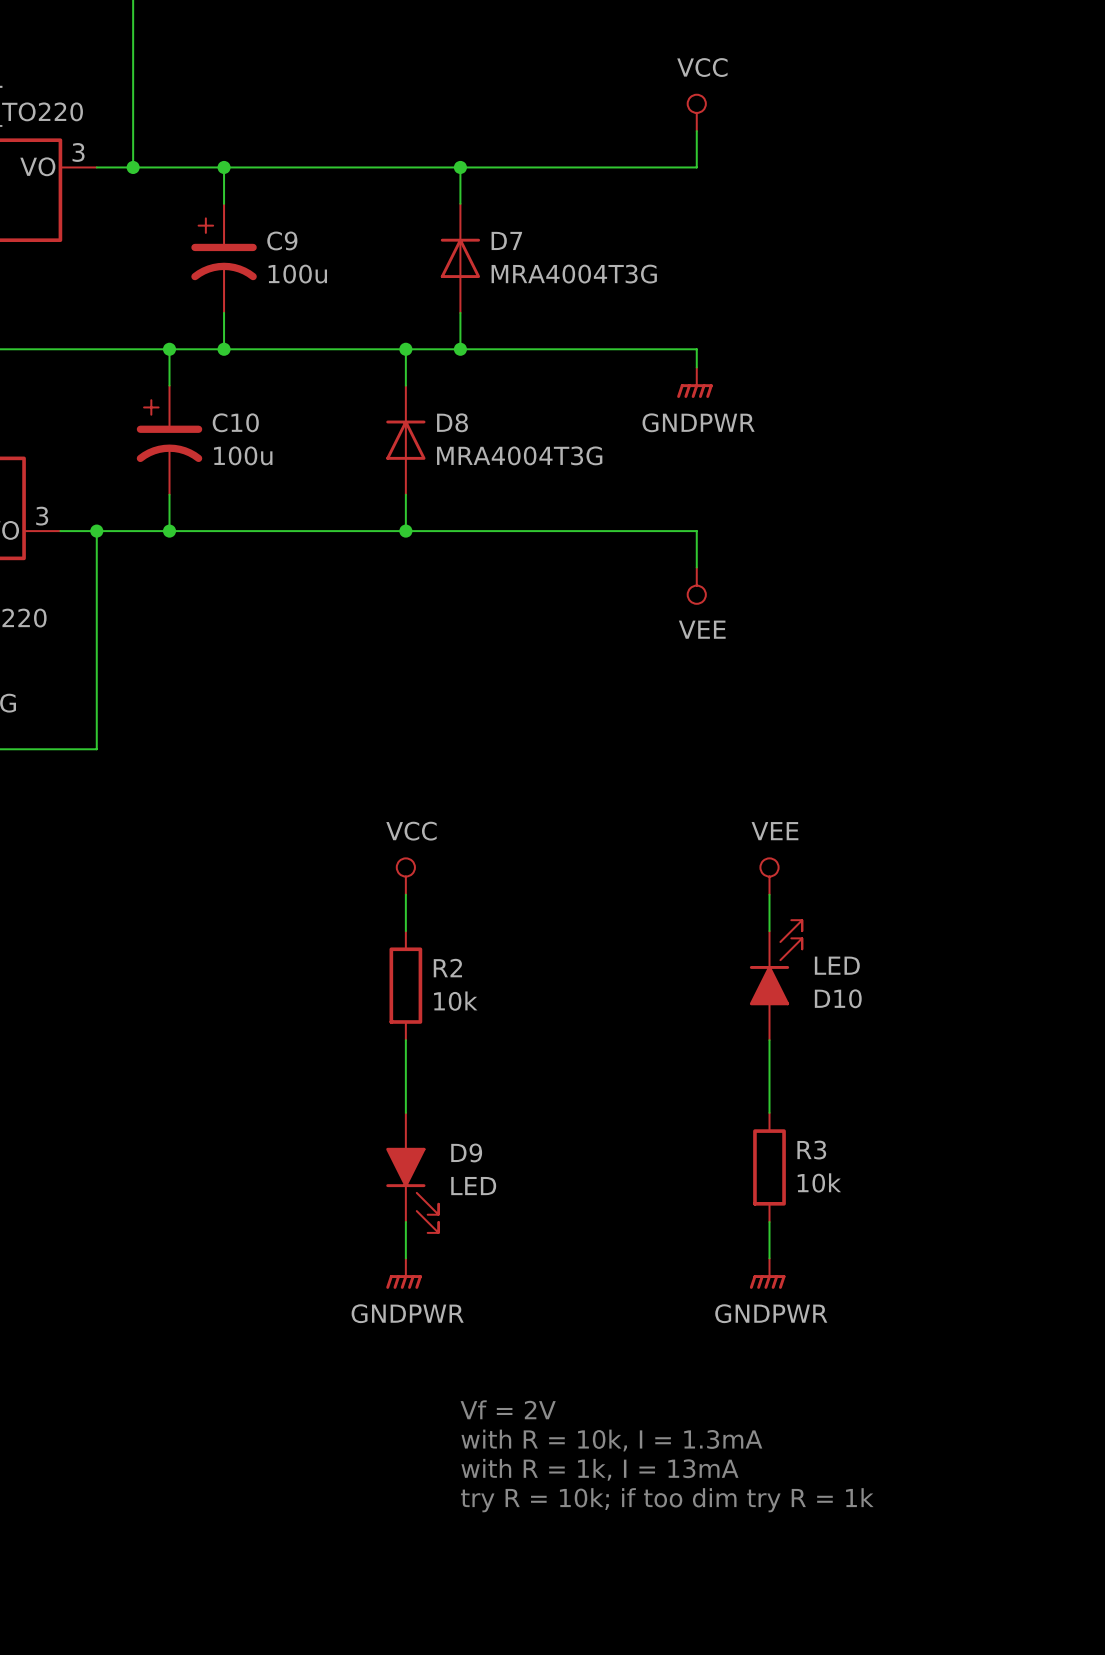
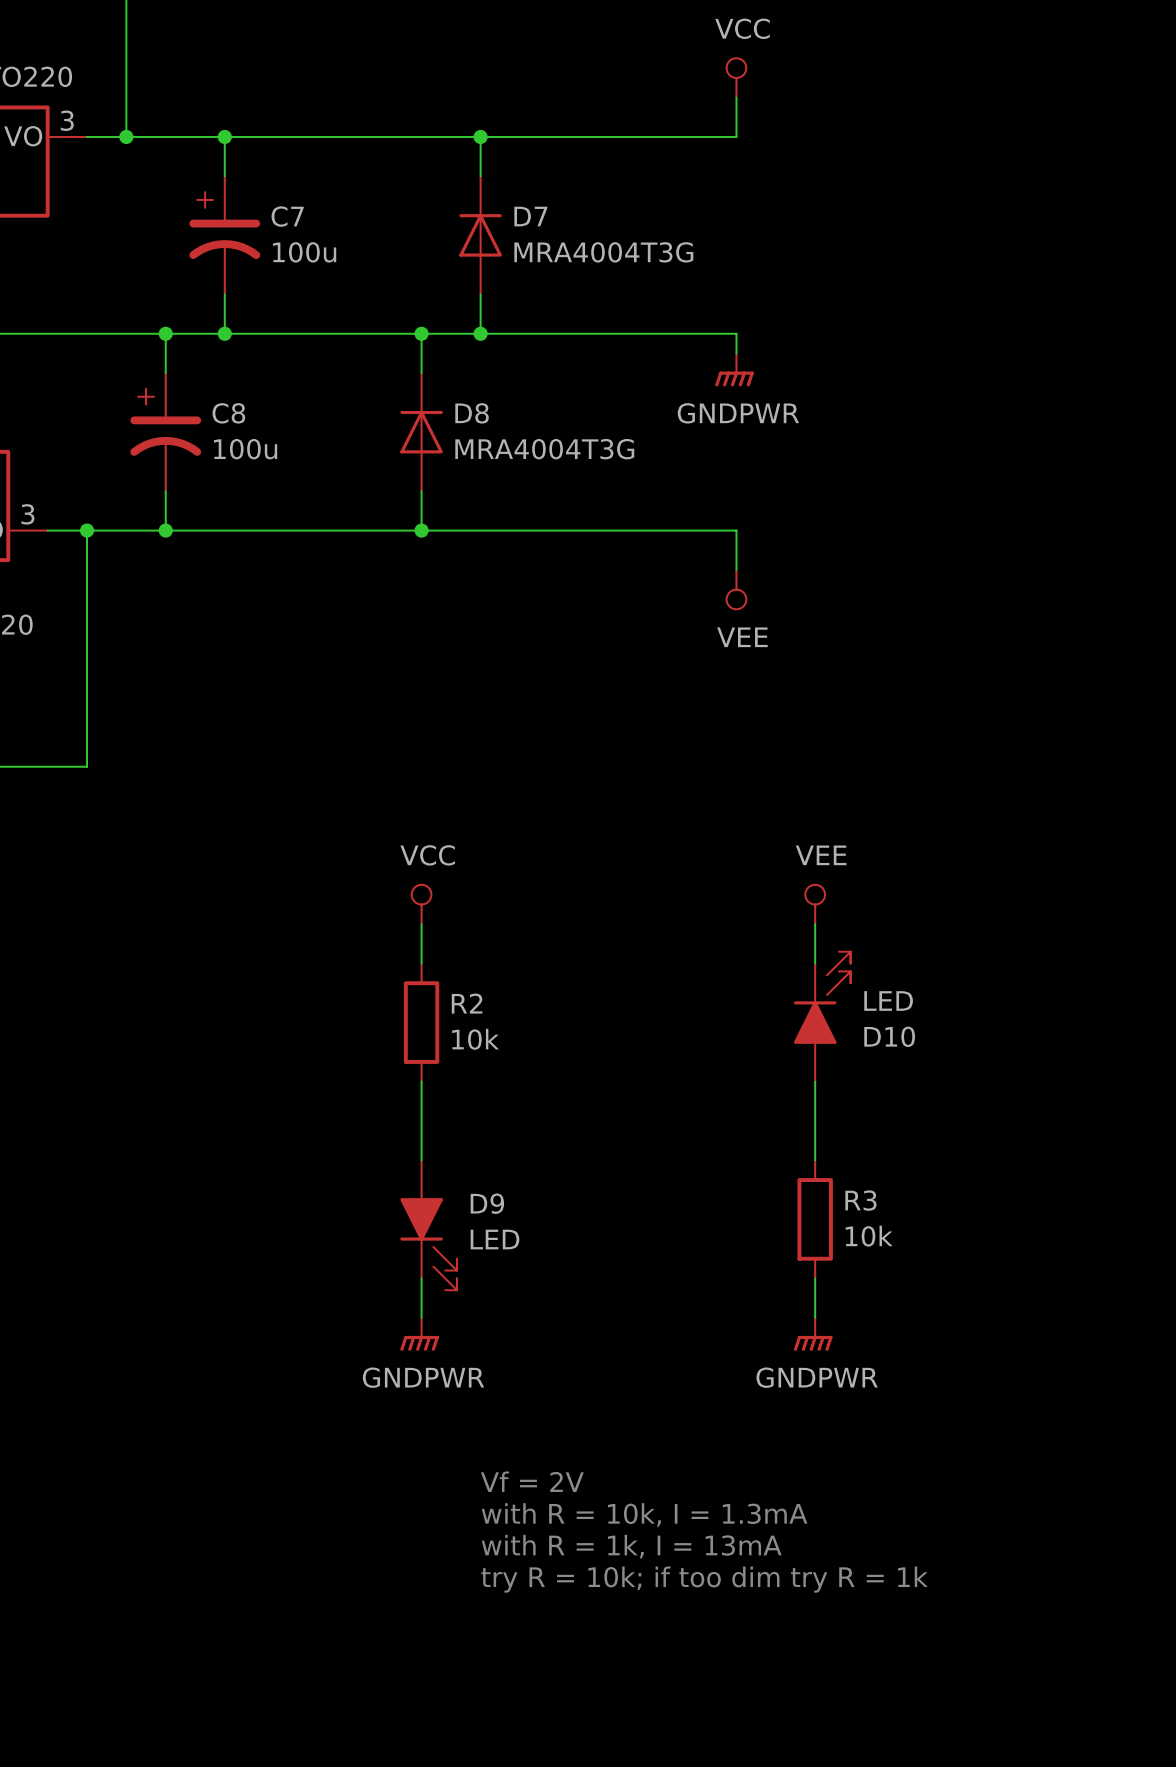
C9 name: C9 (282, 240) -> C7 (287, 216)
C10 name: C10 (235, 422) -> C8 (228, 413)

